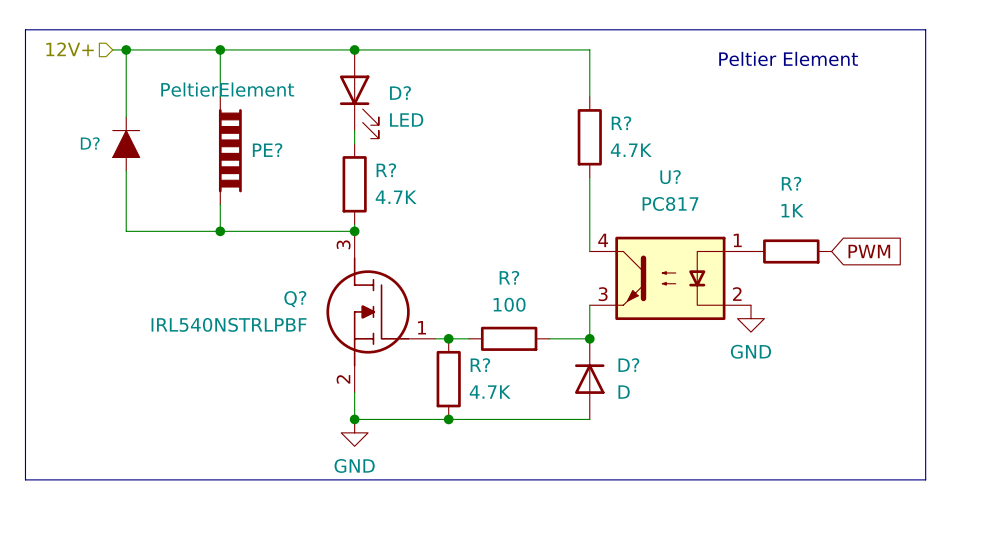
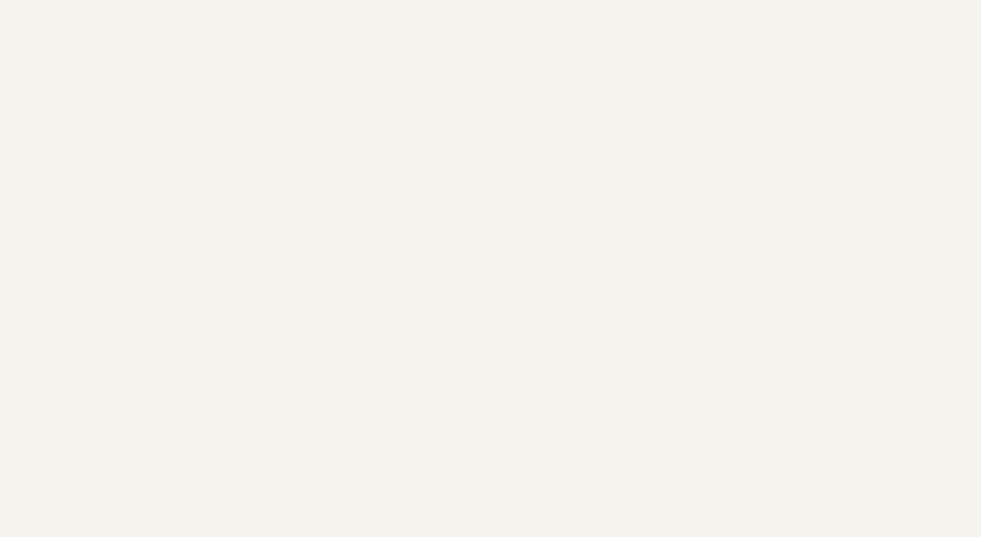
line: (25, 29) (25, 479) (925, 479) (925, 29) (25, 29) -> none
hierarchical label: 12V+ (70, 49) -> none
wire: (112, 49) (589, 49) (589, 96) -> none
wire: (126, 49) (126, 117) -> none
junction: (126, 49) -> none
wire: (220, 49) (220, 96) -> none
junction: (220, 49) -> none
junction: (354, 49) -> none
text: Peltier Element (788, 58) -> none
D?: LED (359, 94) -> none
wire: (354, 130) (354, 144) -> none
R?: 4.7K (589, 137) -> none
D?: (126, 144) -> none
PE?: PeltierElement (230, 150) -> none
wire: (126, 170) (126, 231) (354, 231) (354, 224) -> none
wire: (589, 177) (589, 251) -> none
R?: 4.7K (354, 184) -> none
wire: (220, 204) (220, 231) -> none
junction: (220, 231) -> none
junction: (354, 231) -> none
R?: 1K (791, 251) -> none
global label: PWM (869, 251) -> none
U?: PC817 (670, 278) -> none
wire: (589, 305) (589, 338) (549, 338) -> none
Q?: IRL540NSTRLPBF (380, 311) -> none
power symbol: GND (751, 318) -> none
wire: (435, 338) (468, 338) -> none
junction: (448, 338) -> none
R?: 100 (509, 338) -> none
junction: (589, 338) -> none
R?: 4.7K (448, 379) -> none
D?: D (589, 379) -> none
wire: (354, 392) (354, 419) (589, 419) -> none
junction: (354, 419) -> none
junction: (448, 419) -> none
power symbol: GND (354, 432) -> none

